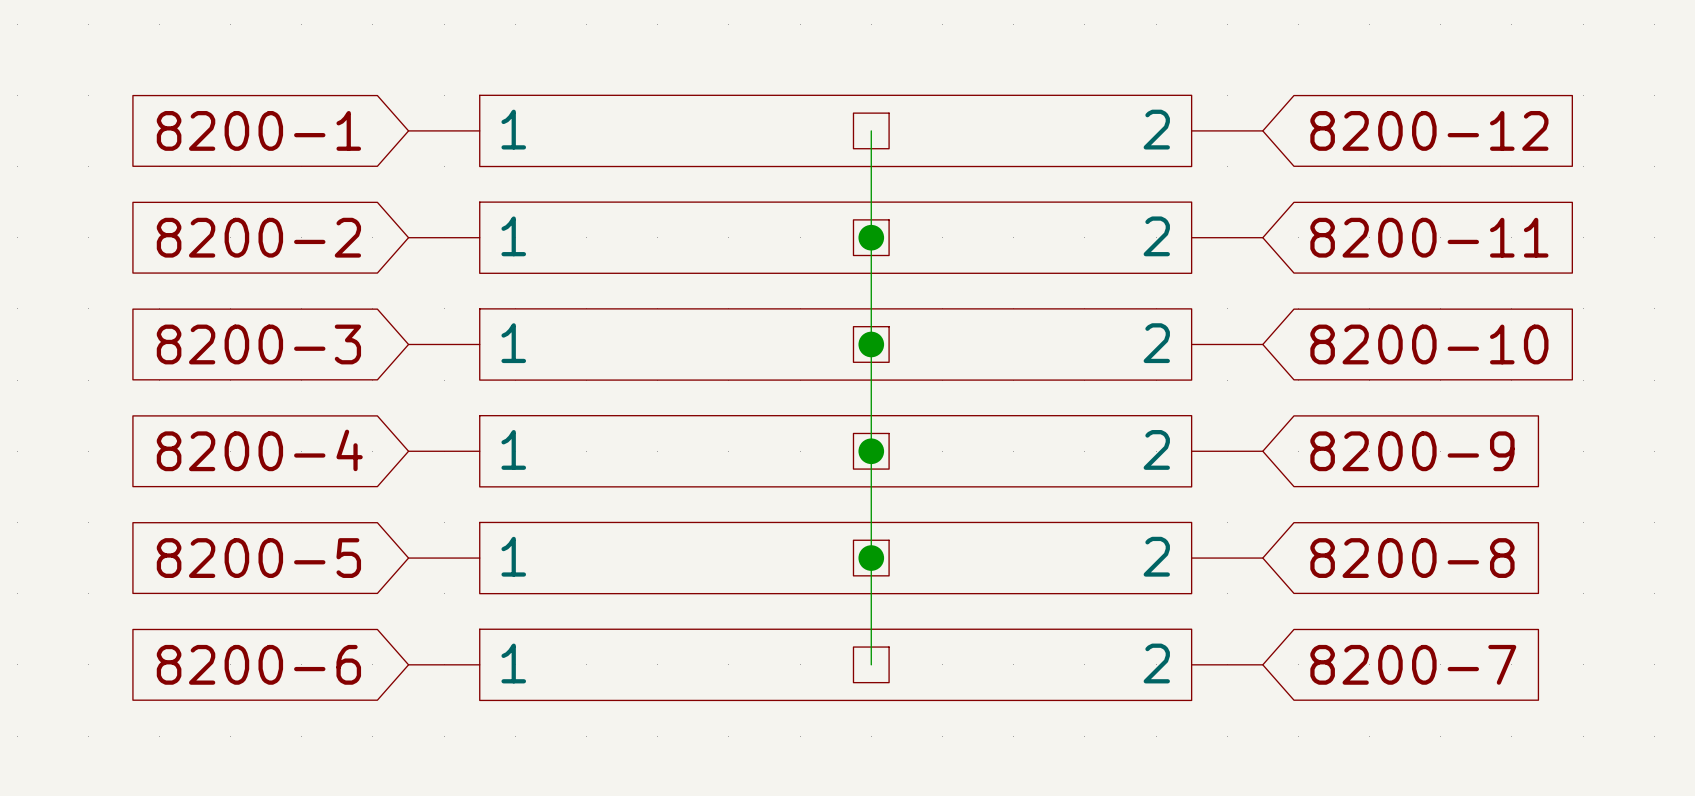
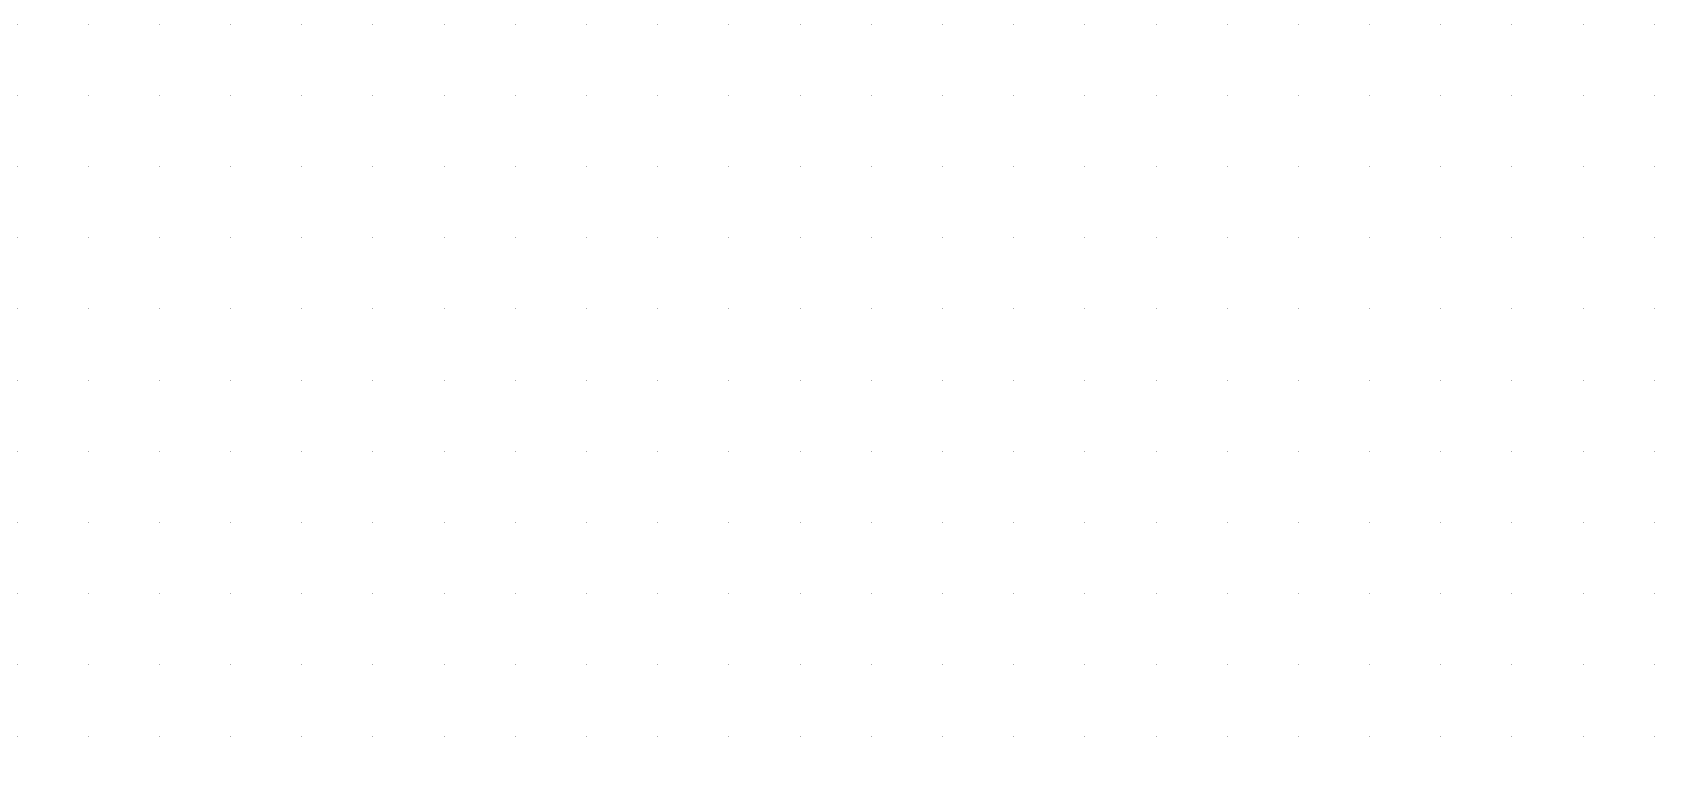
global label: 8200-1 (258, 130) -> none
part: (835, 130) -> none
wire: (871, 130) (871, 664) -> none
global label: 8200-12 (1429, 130) -> none
global label: 8200-2 (258, 237) -> none
part: (835, 237) -> none
junction: (871, 237) -> none
global label: 8200-11 (1429, 237) -> none
global label: 8200-3 (258, 344) -> none
part: (835, 344) -> none
junction: (871, 344) -> none
global label: 8200-10 (1429, 344) -> none
global label: 8200-4 (259, 450) -> none
part: (835, 451) -> none
junction: (871, 451) -> none
global label: 8200-9 (1412, 451) -> none
global label: 8200-5 (258, 558) -> none
part: (835, 558) -> none
junction: (871, 558) -> none
global label: 8200-8 (1412, 558) -> none
global label: 8200-6 (258, 664) -> none
part: (835, 664) -> none
global label: 8200-7 (1413, 664) -> none

